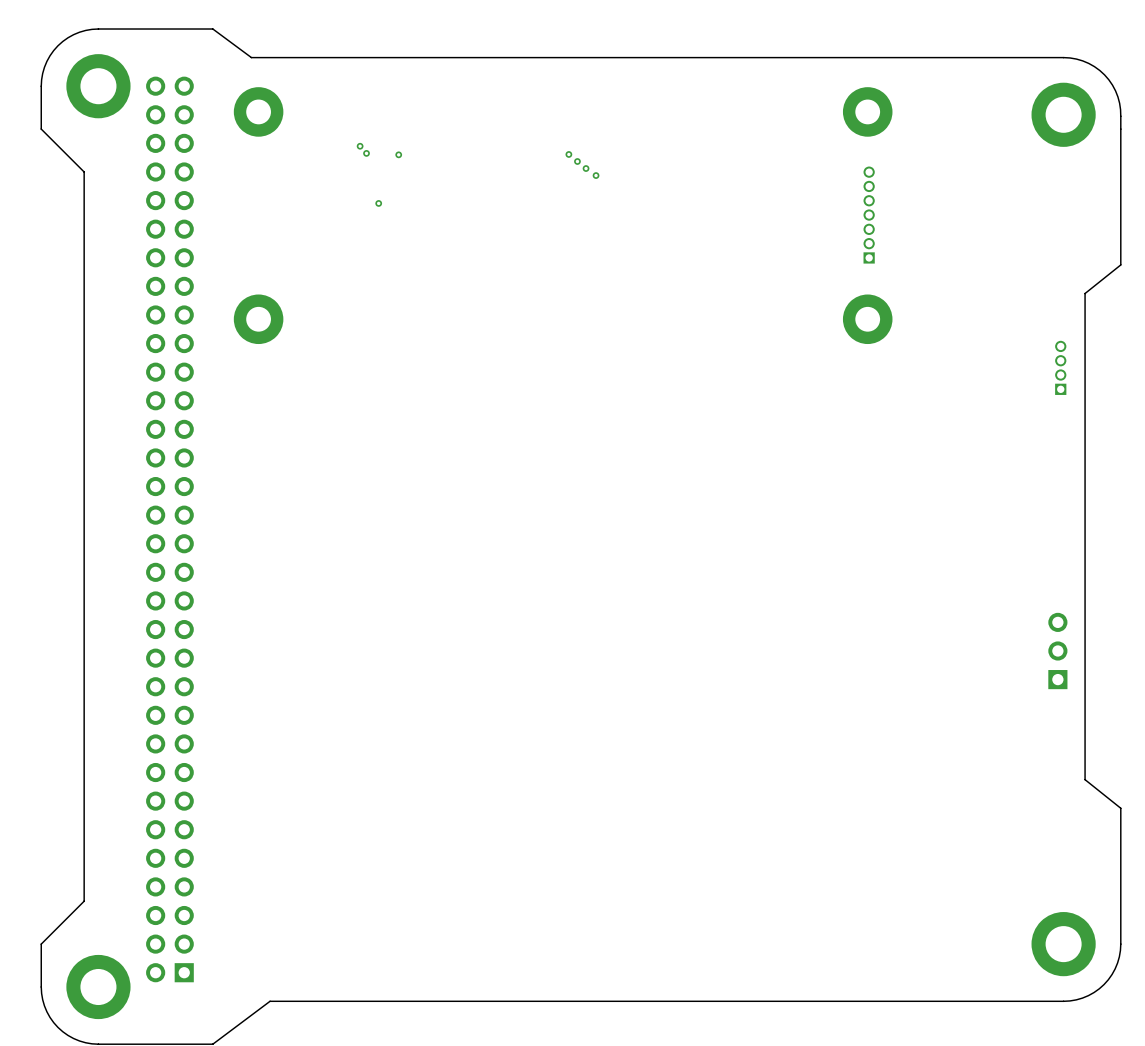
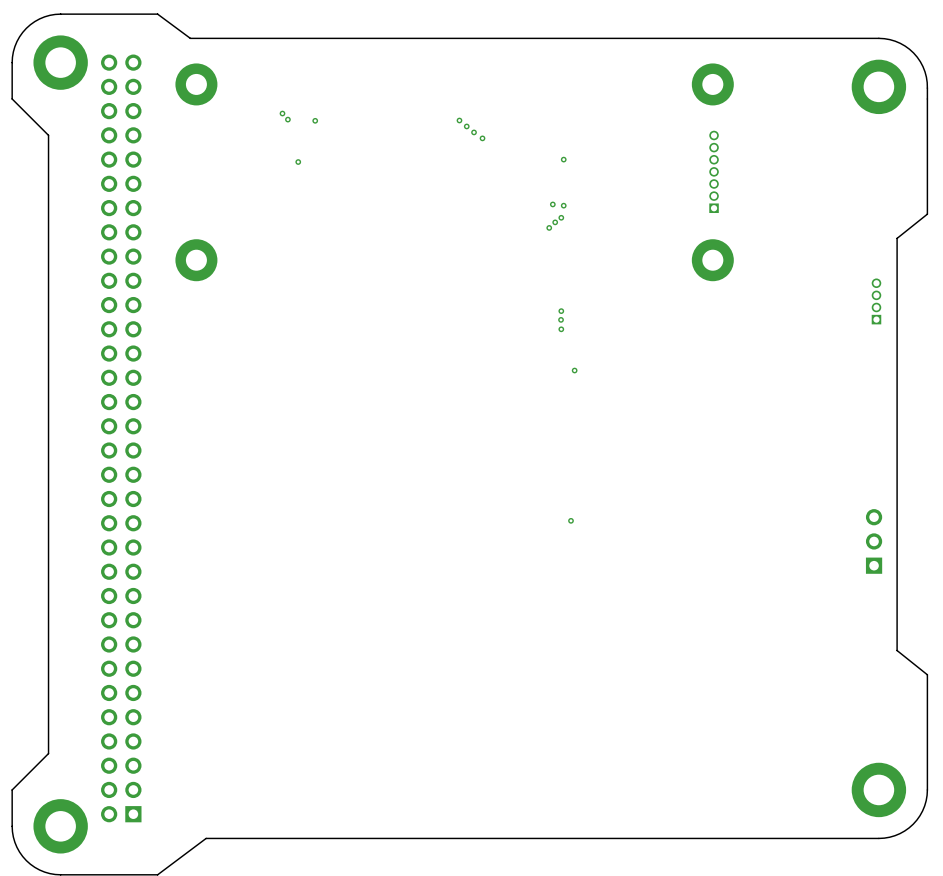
via: none -> (563, 159)
via: none -> (552, 204)
via: none -> (563, 205)
via: none -> (561, 217)
via: none -> (555, 222)
via: none -> (549, 227)
via: none -> (561, 311)
via: none -> (561, 319)
via: none -> (561, 329)
via: none -> (574, 370)
via: none -> (571, 520)

